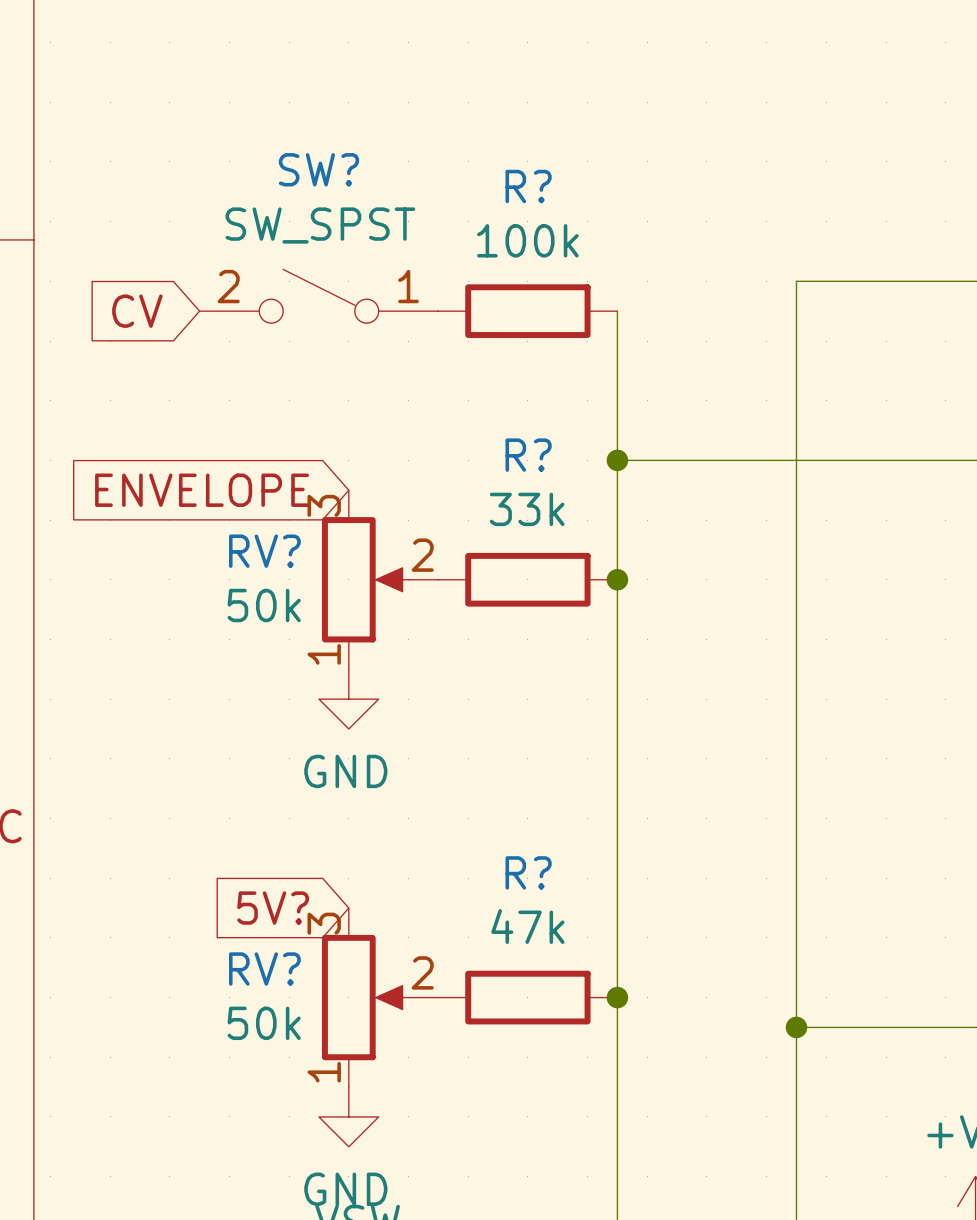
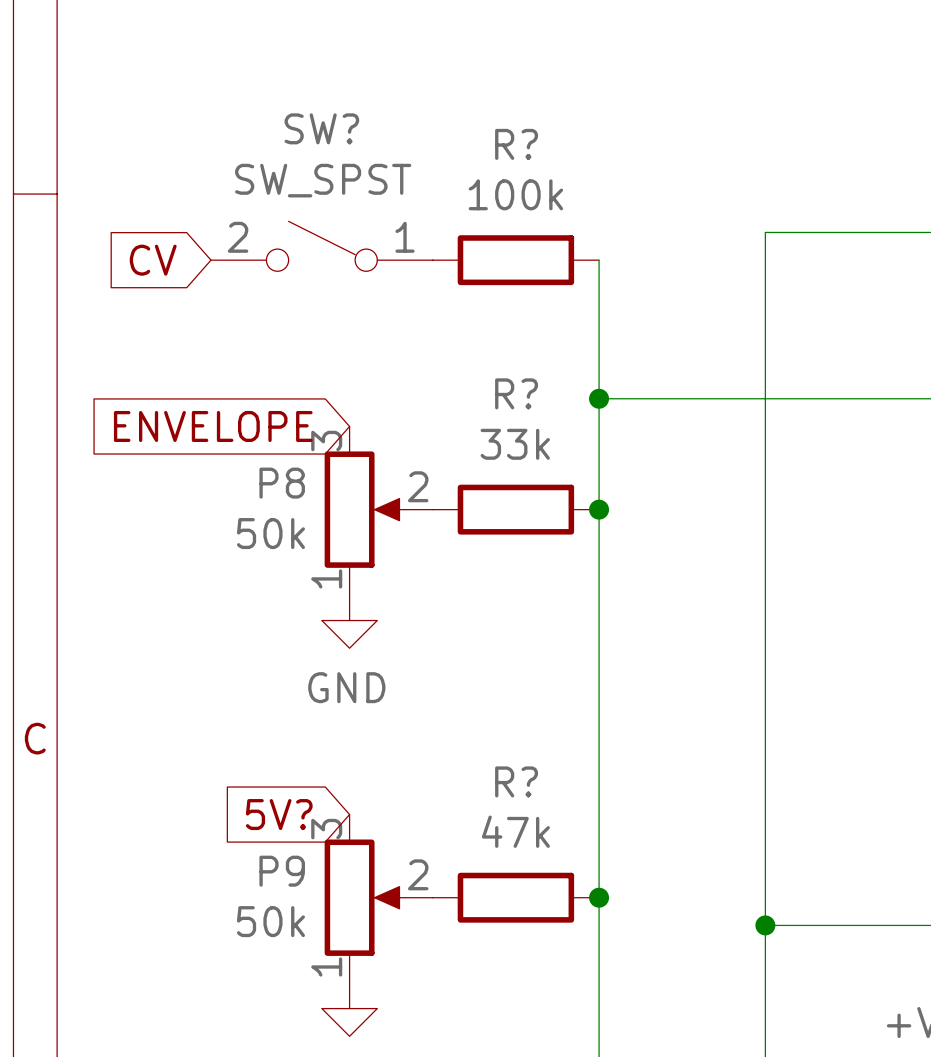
RV? name: RV? (264, 551) -> P8 (282, 483)
RV? name: RV? (264, 969) -> P9 (282, 871)

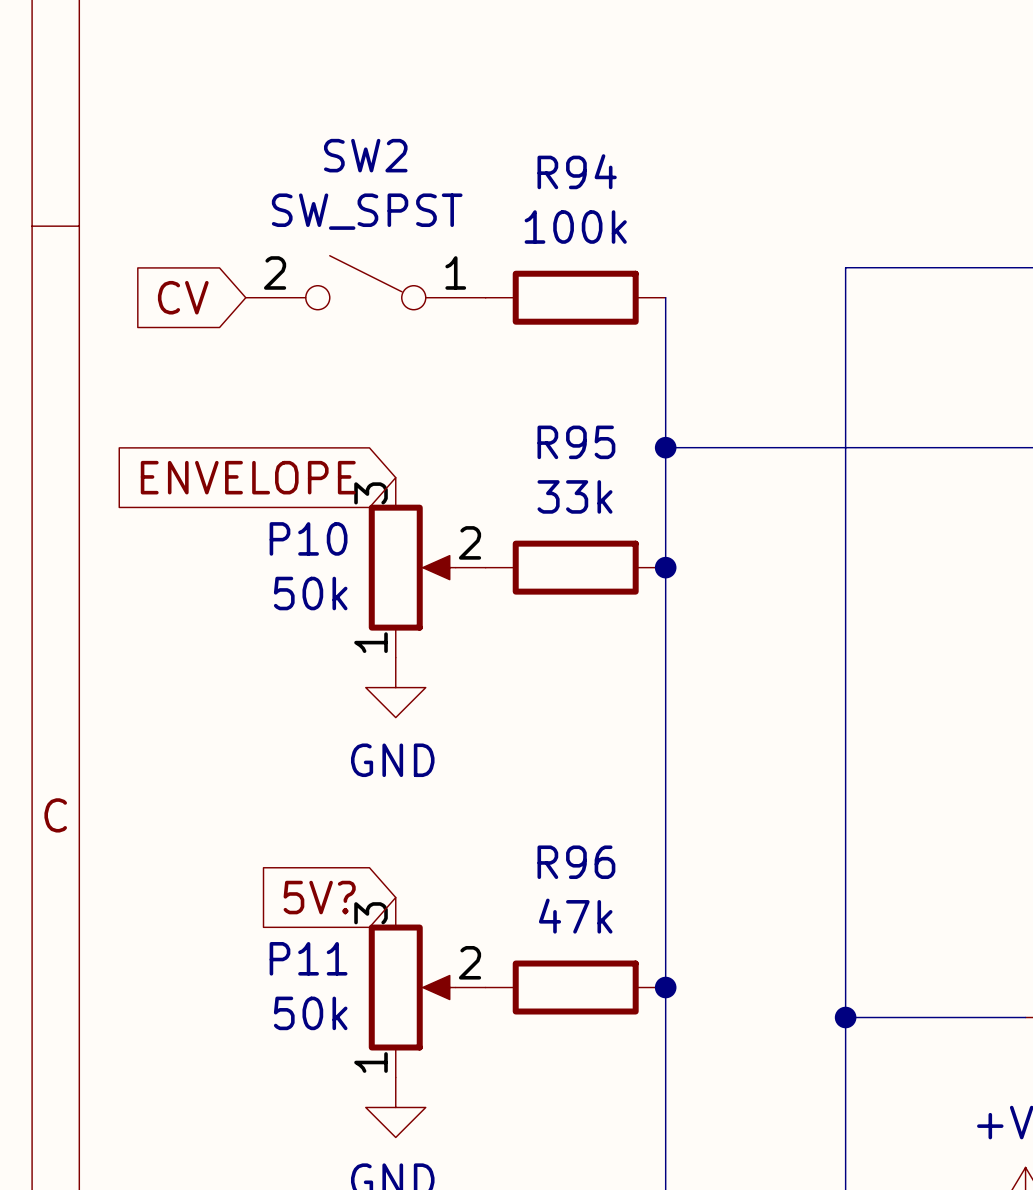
SW? name: SW? (321, 128) -> SW2 (365, 155)
R? name: R? (516, 144) -> R94 (577, 171)
R? name: R? (516, 393) -> R95 (576, 442)
P8 name: P8 (282, 483) -> P10 (308, 538)
R? name: R? (516, 781) -> R96 (576, 862)
P9 name: P9 (282, 871) -> P11 (308, 958)

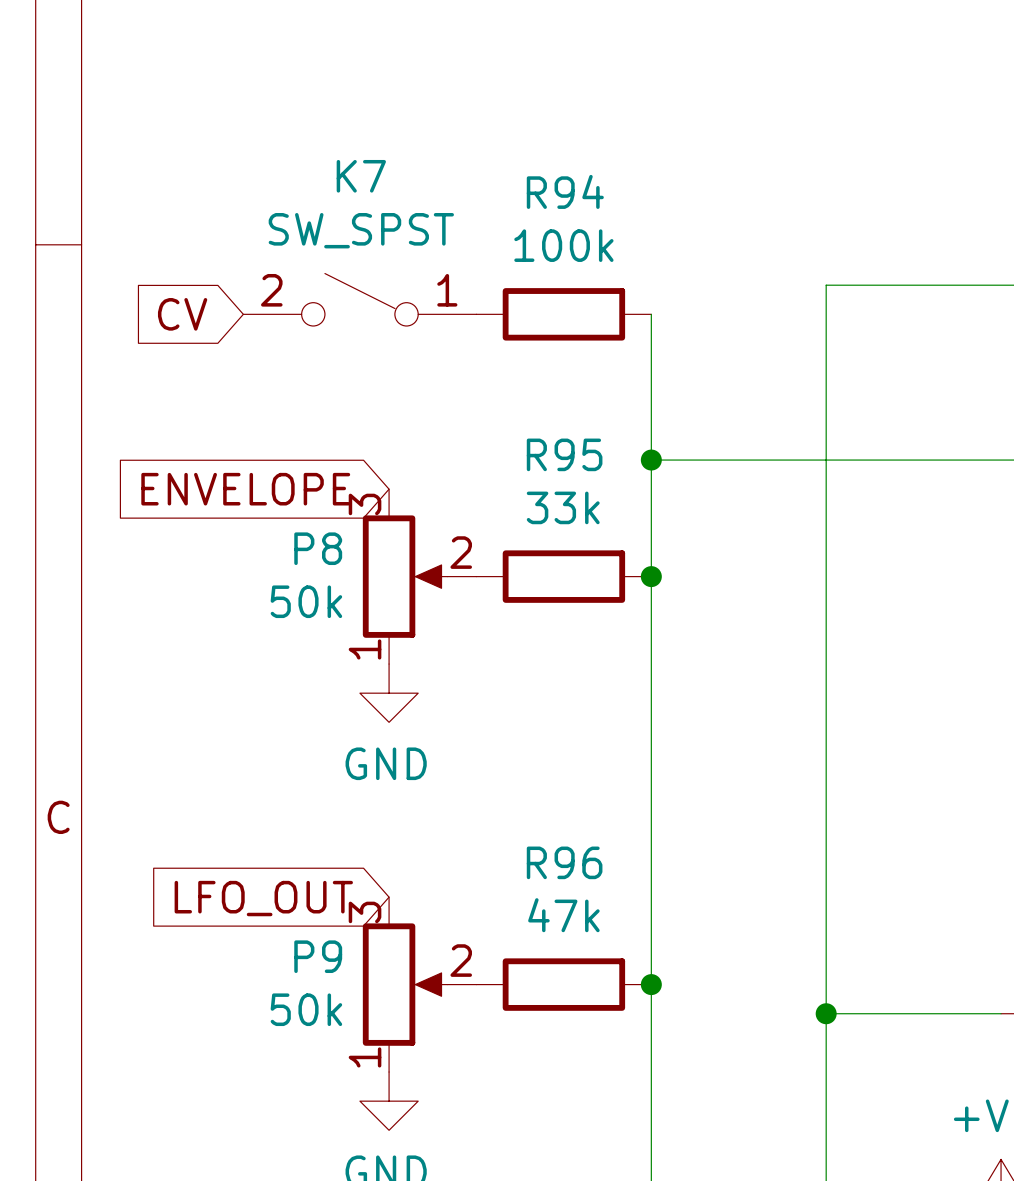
SW2 name: SW2 (365, 155) -> K7 (361, 176)
P10 name: P10 (308, 538) -> P8 (318, 548)
global label: 5V? (319, 897) -> LFO_OUT (263, 898)
P11 name: P11 (308, 958) -> P9 (318, 956)

